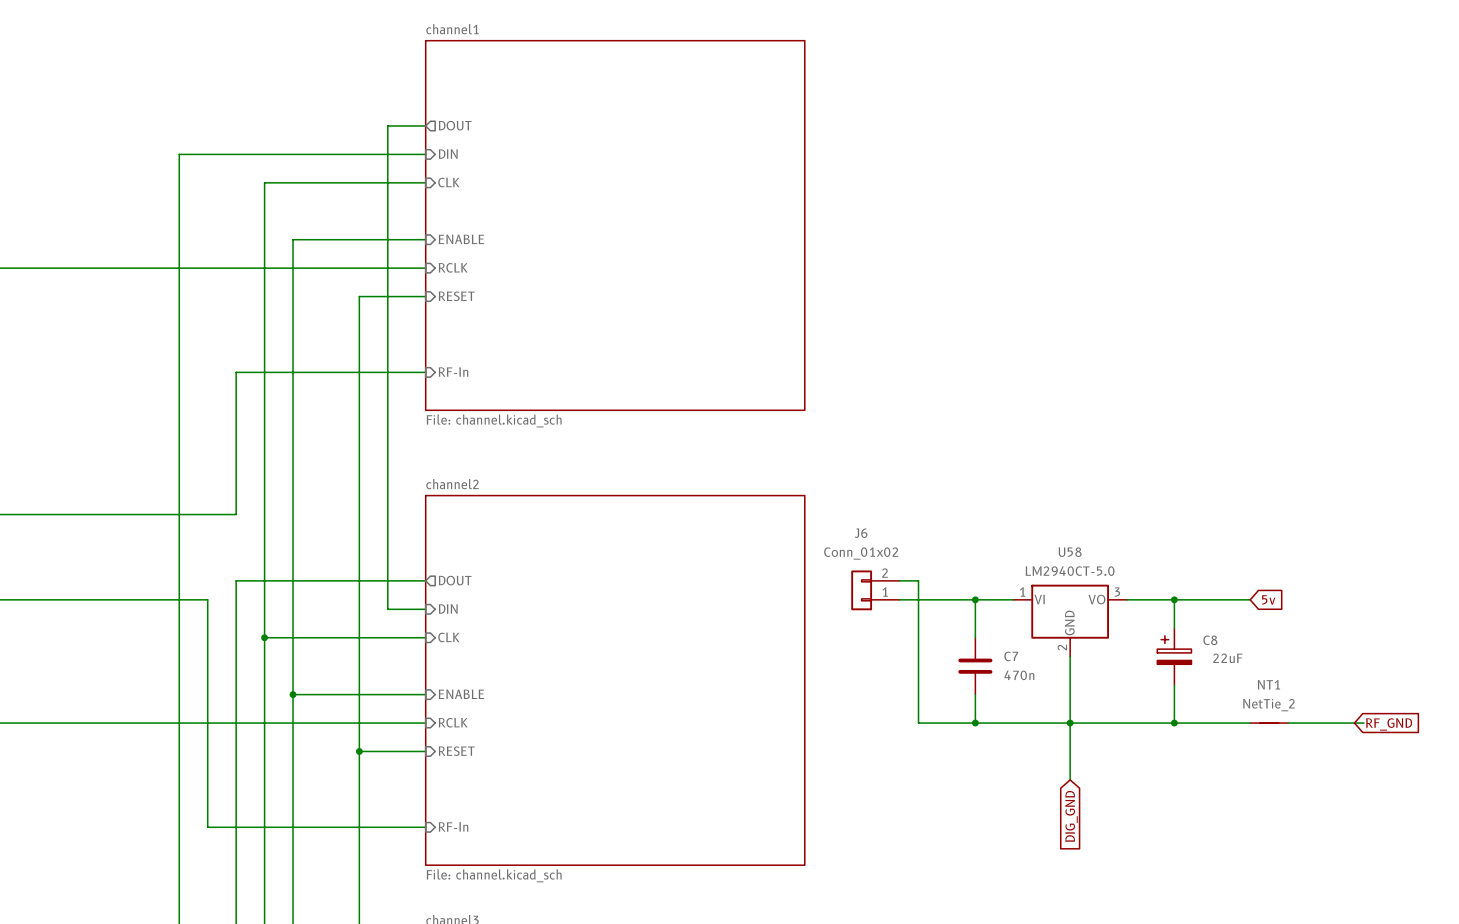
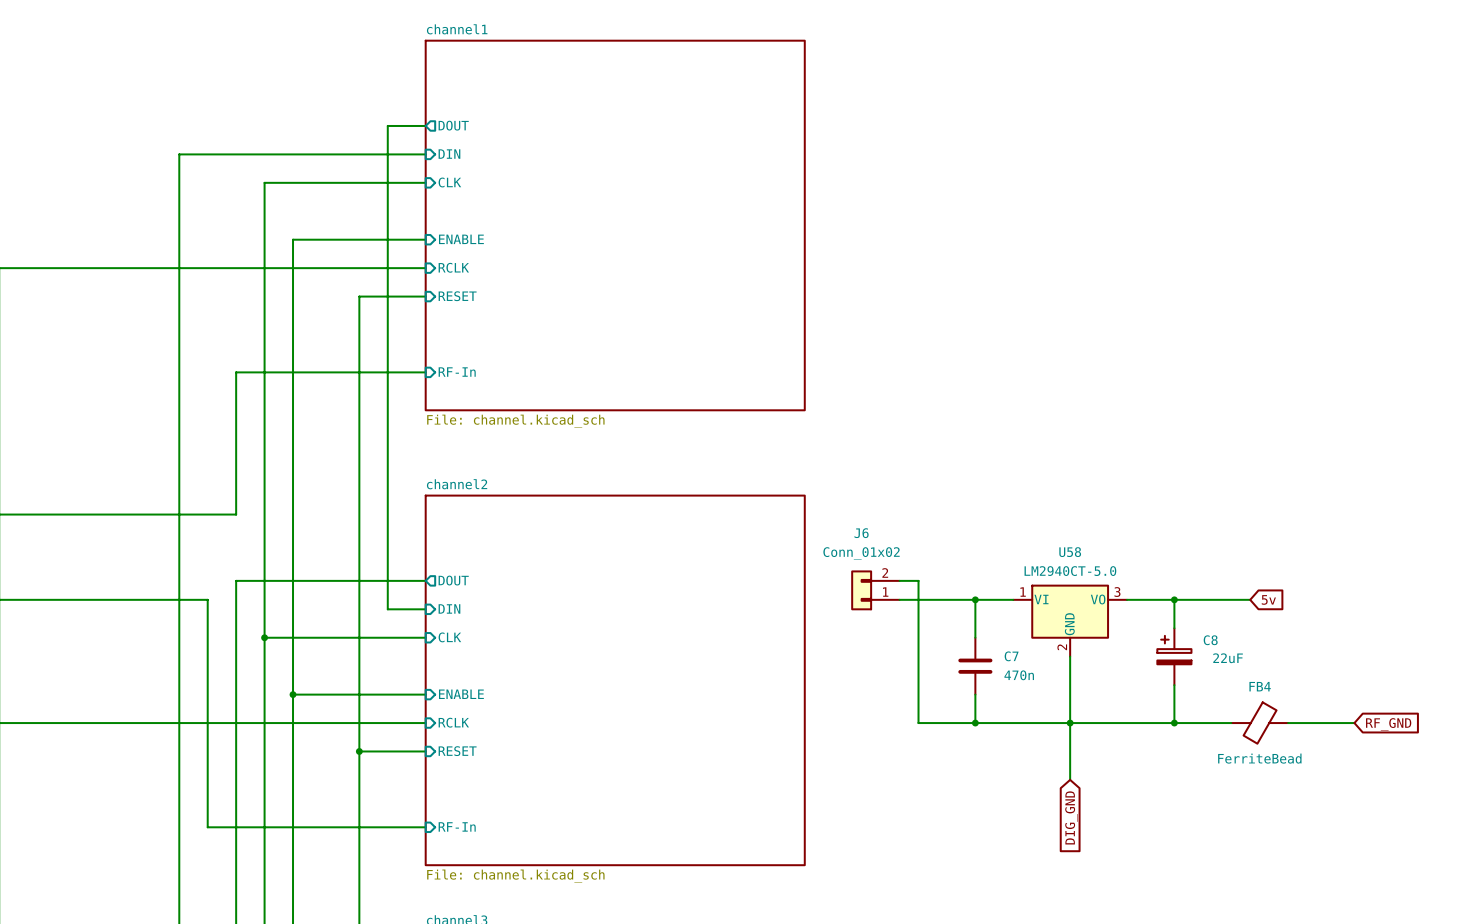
FB4: none -> FerriteBead (1259, 723)
NT1: NetTie_2 (1269, 723) -> none
wire: (1354, 723) (1363, 723) -> none

